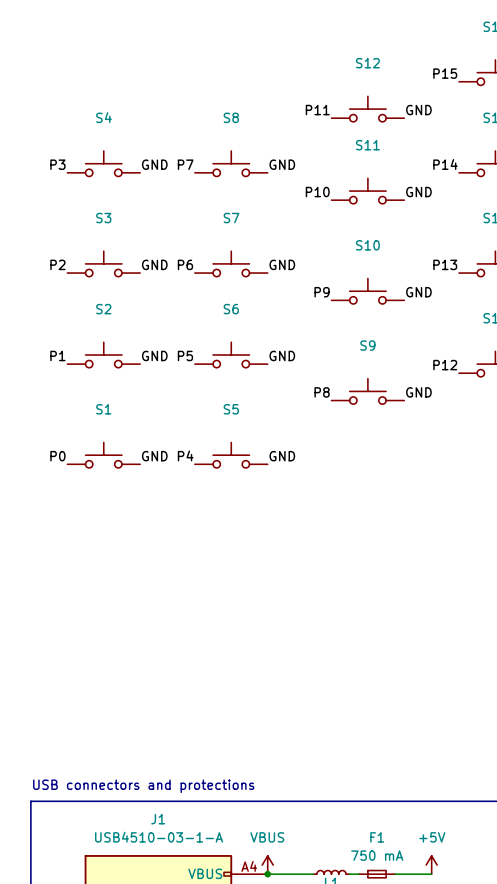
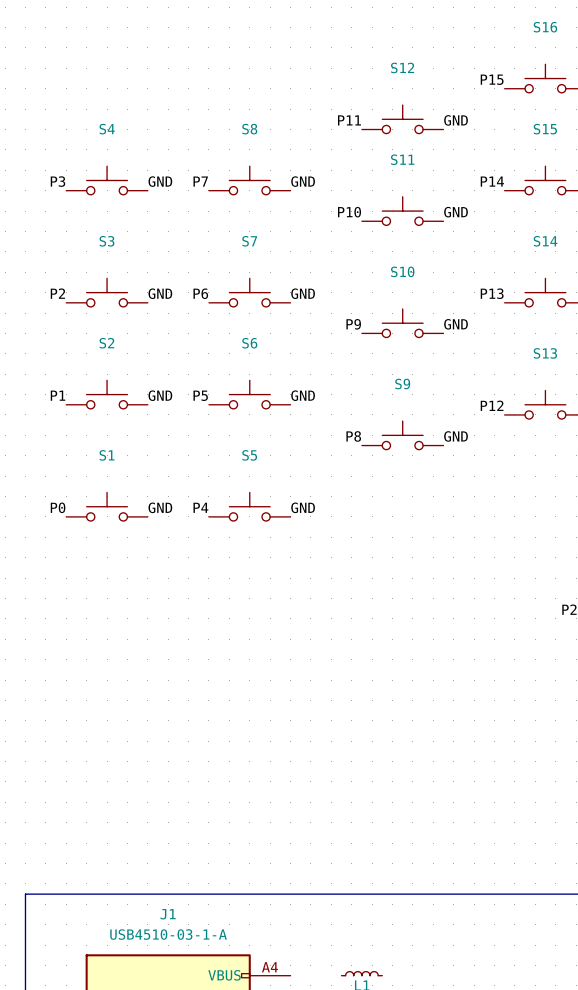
text: USB connectors and protections (143, 786) -> none
power symbol: VBUS (267, 865) -> none
power symbol: +5V (431, 865) -> none
wire: (267, 874) (313, 874) -> none
junction: (267, 874) -> none
wire: (349, 874) (358, 874) -> none
F1: 750 mA (377, 874) -> none
wire: (395, 874) (431, 874) -> none

